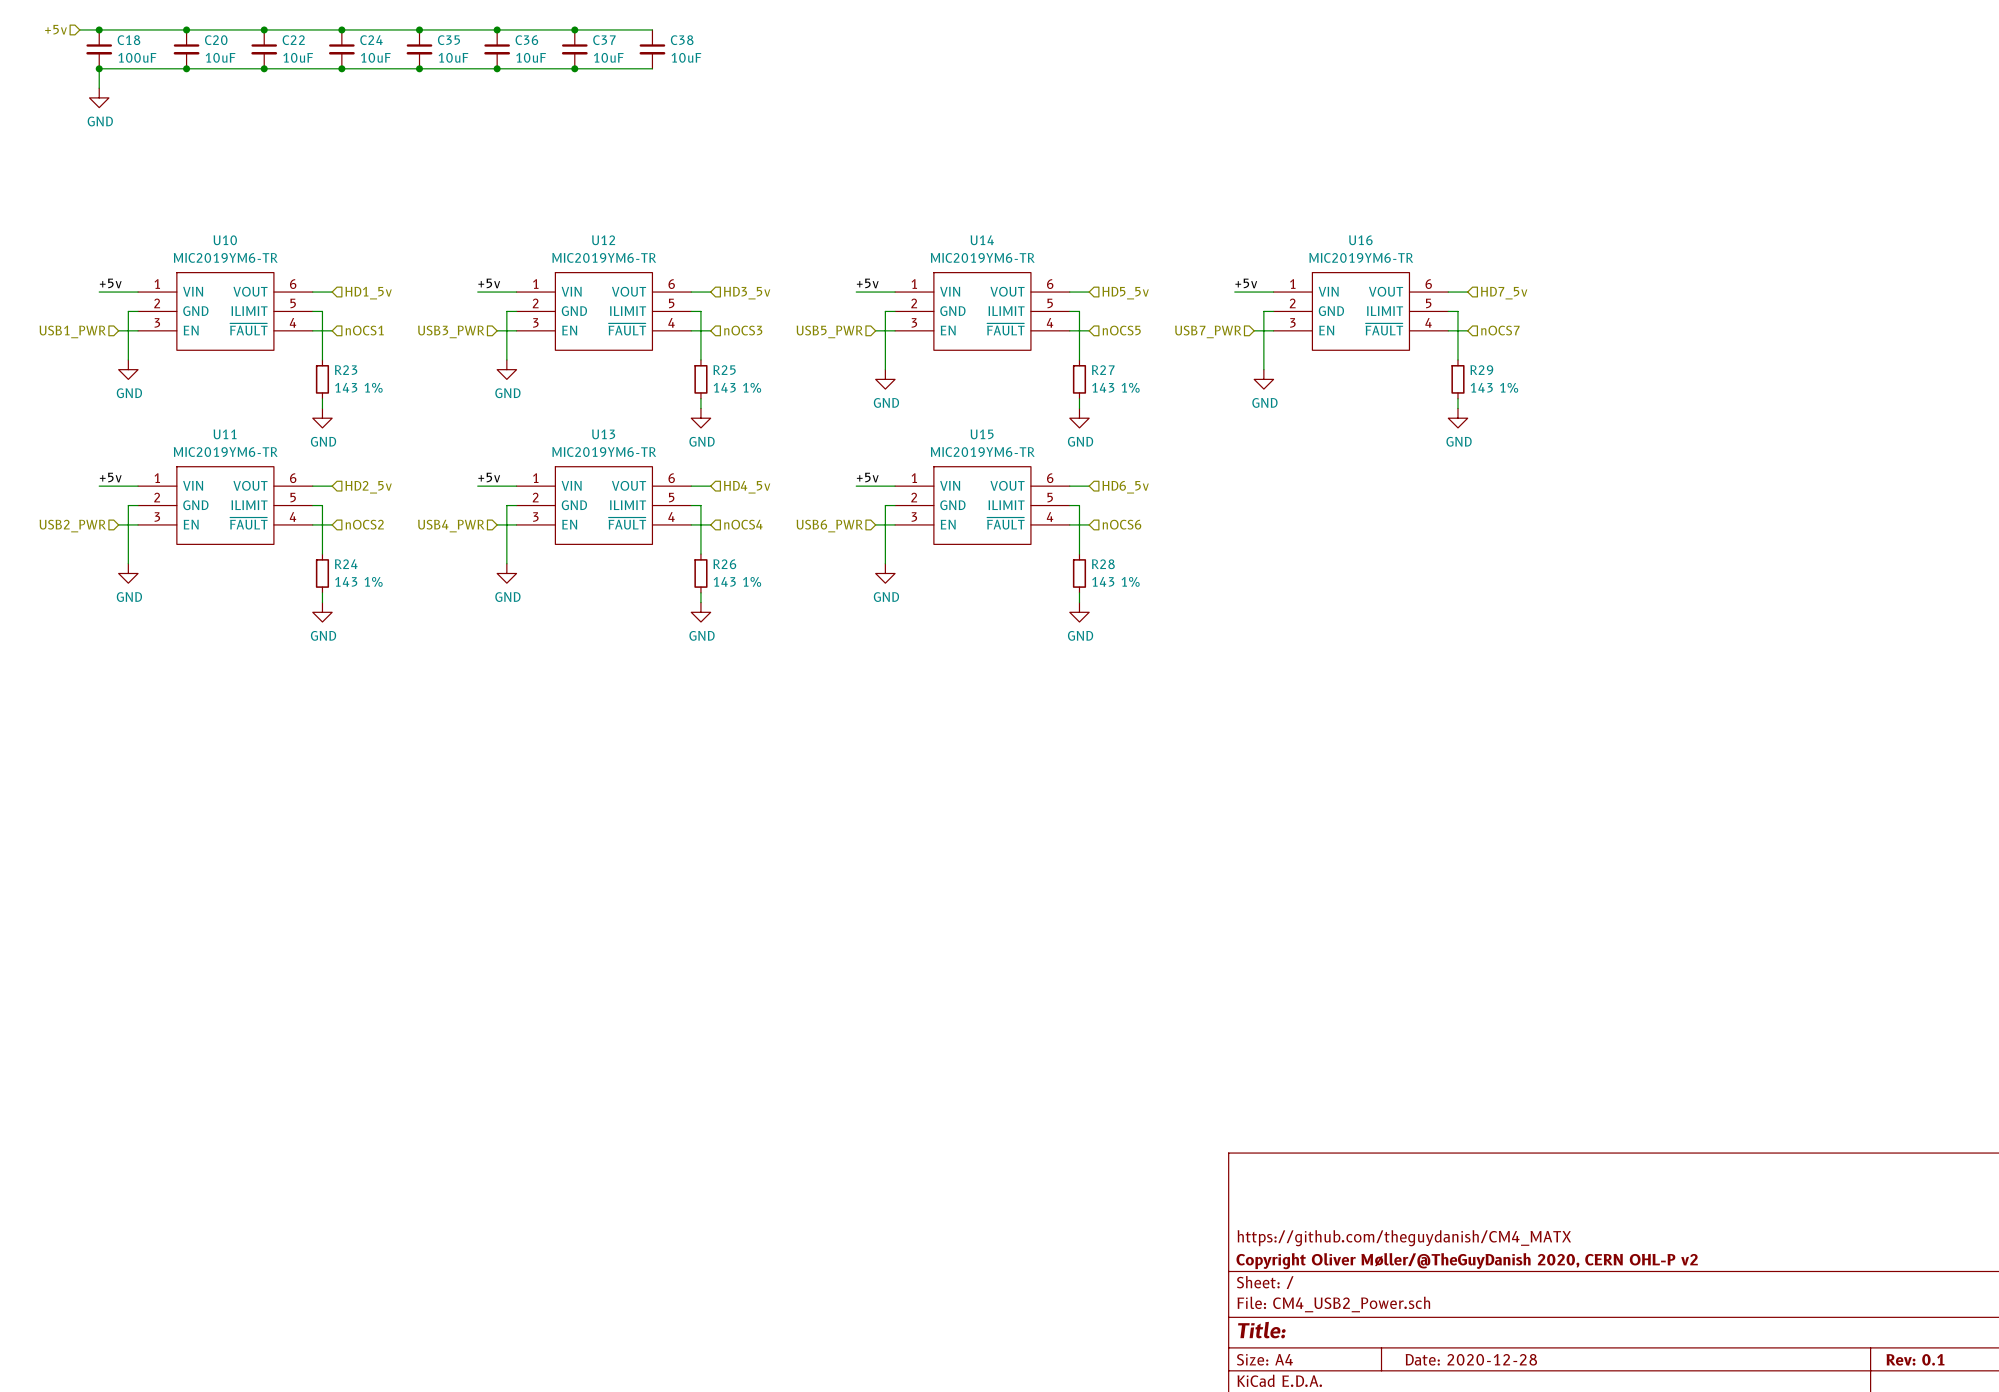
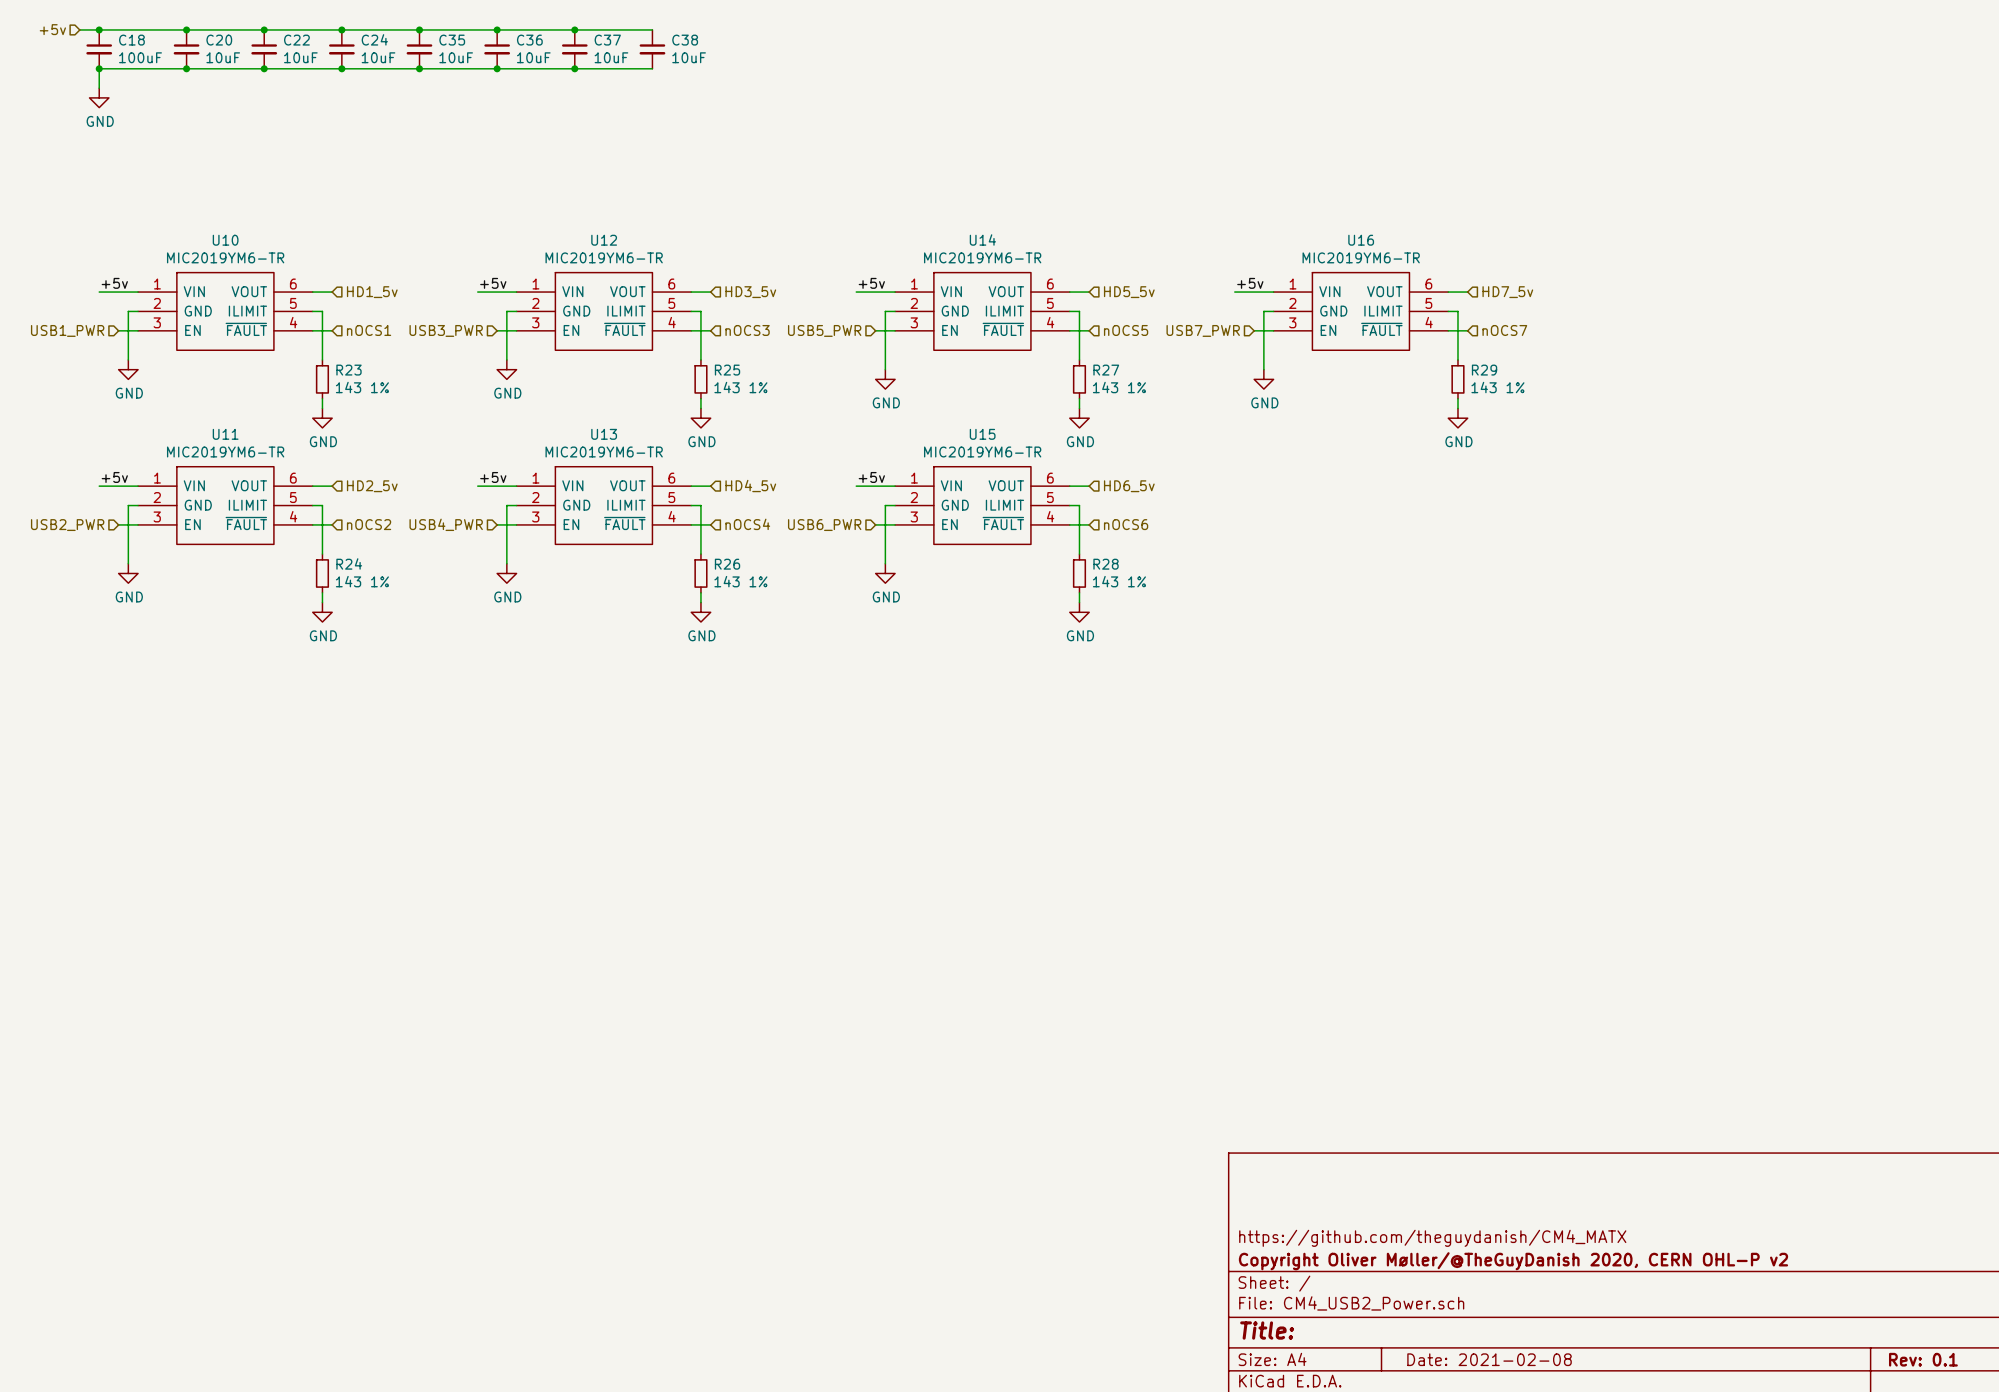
title block: Date: 2020-12-28 (1471, 1359) -> Date: 2021-02-08 (1489, 1359)

